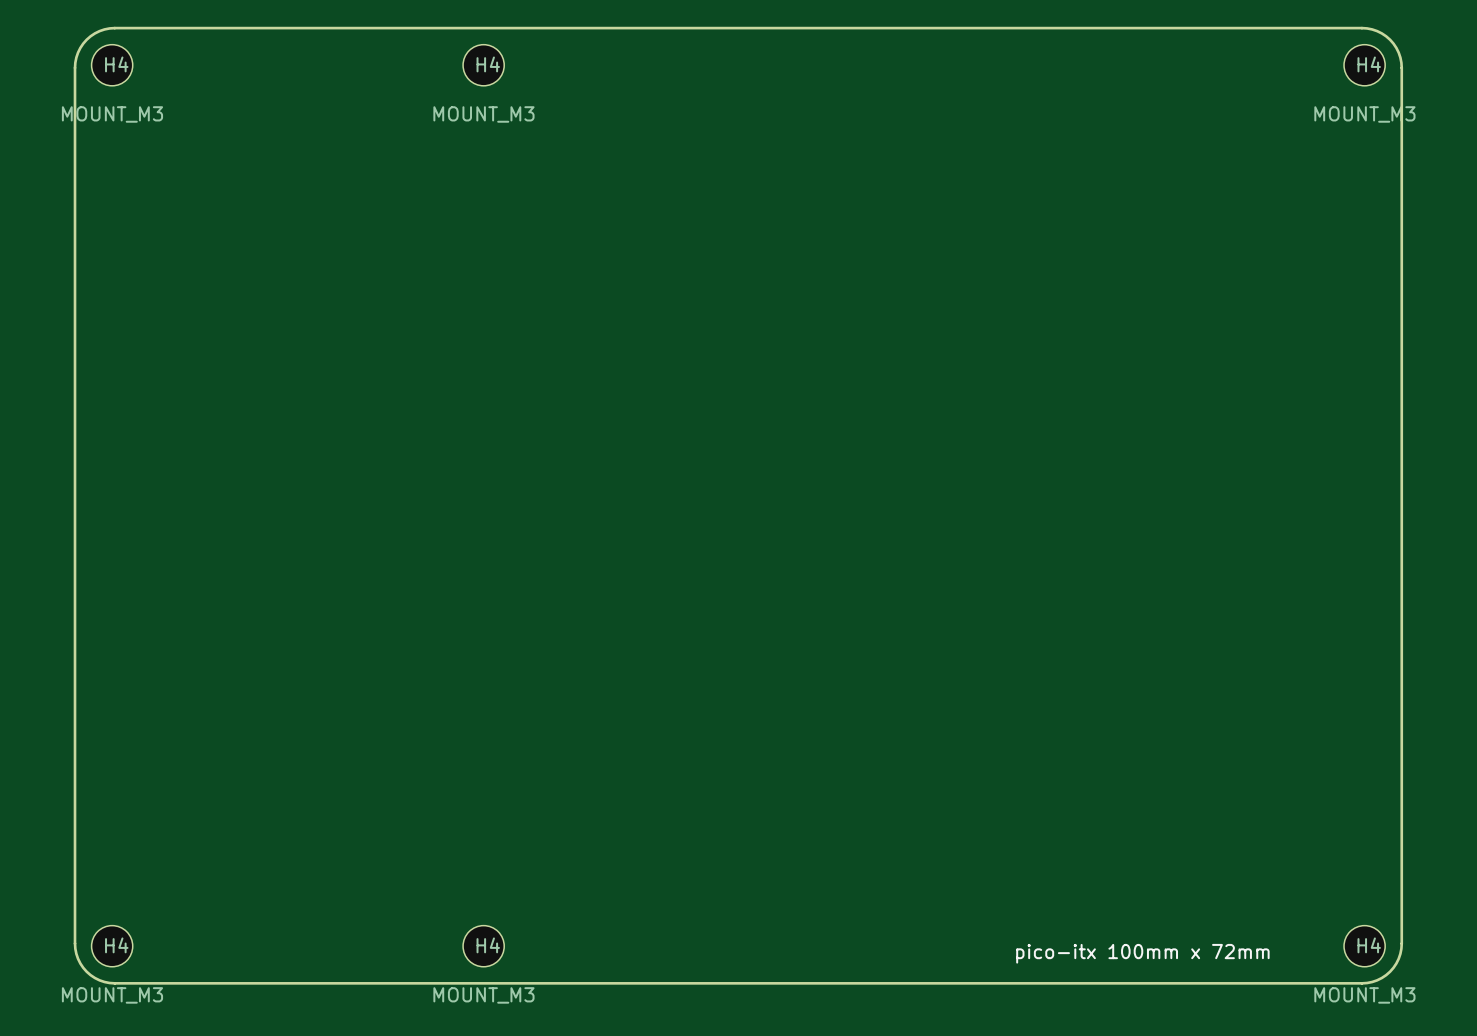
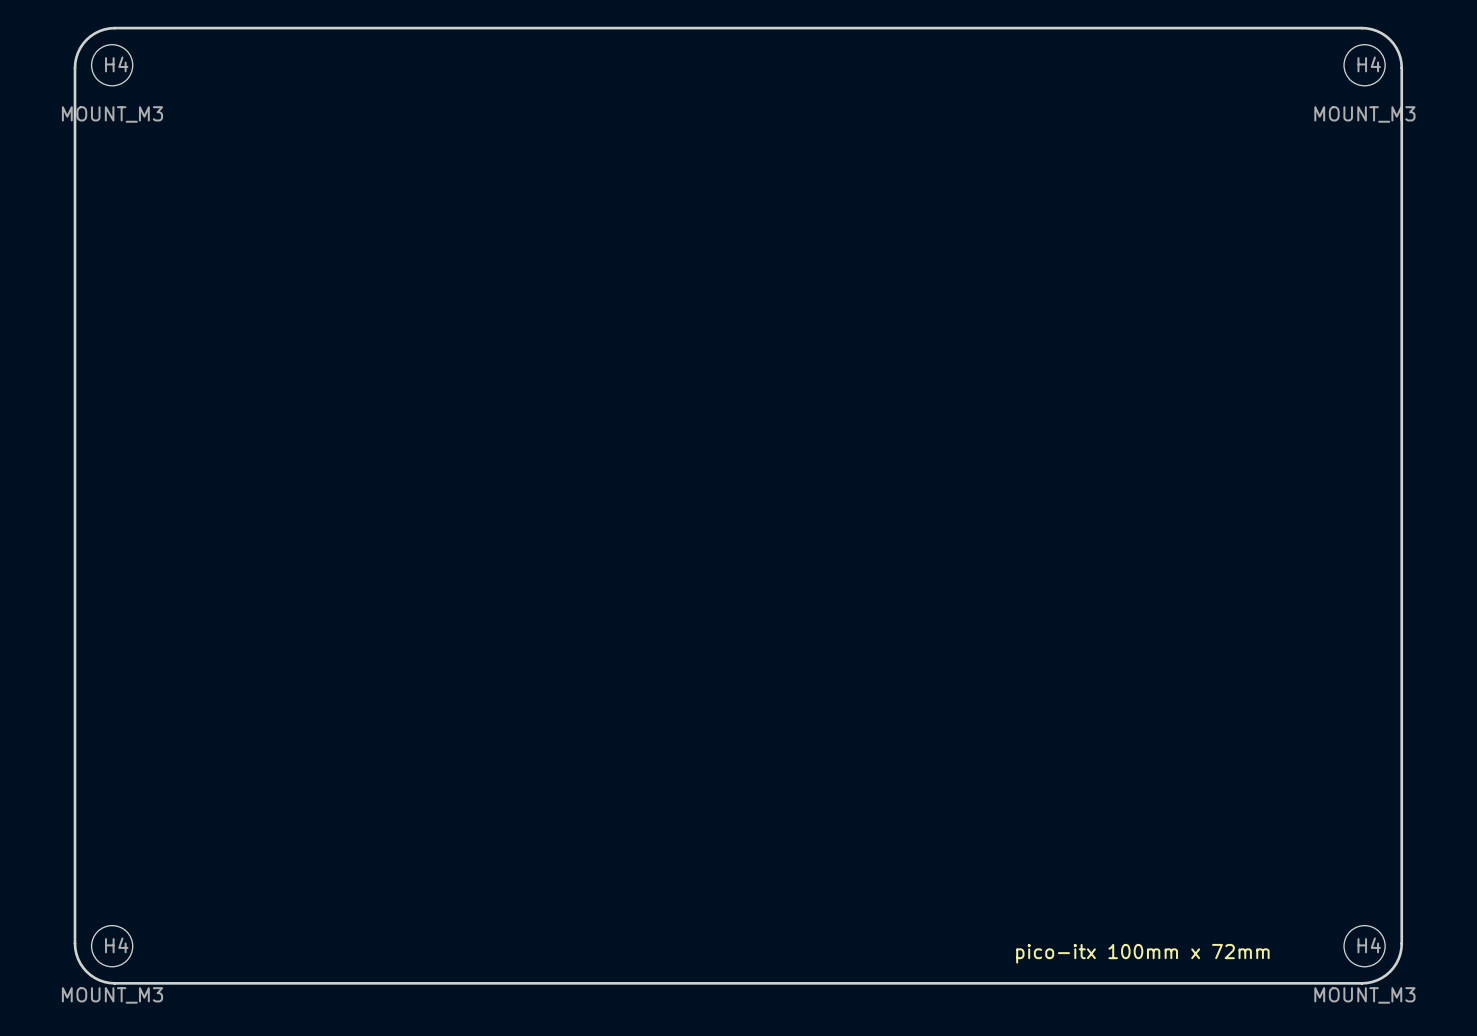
H4: MOUNT_M3 (483, 65) -> none
H4: MOUNT_M3 (483, 946) -> none

